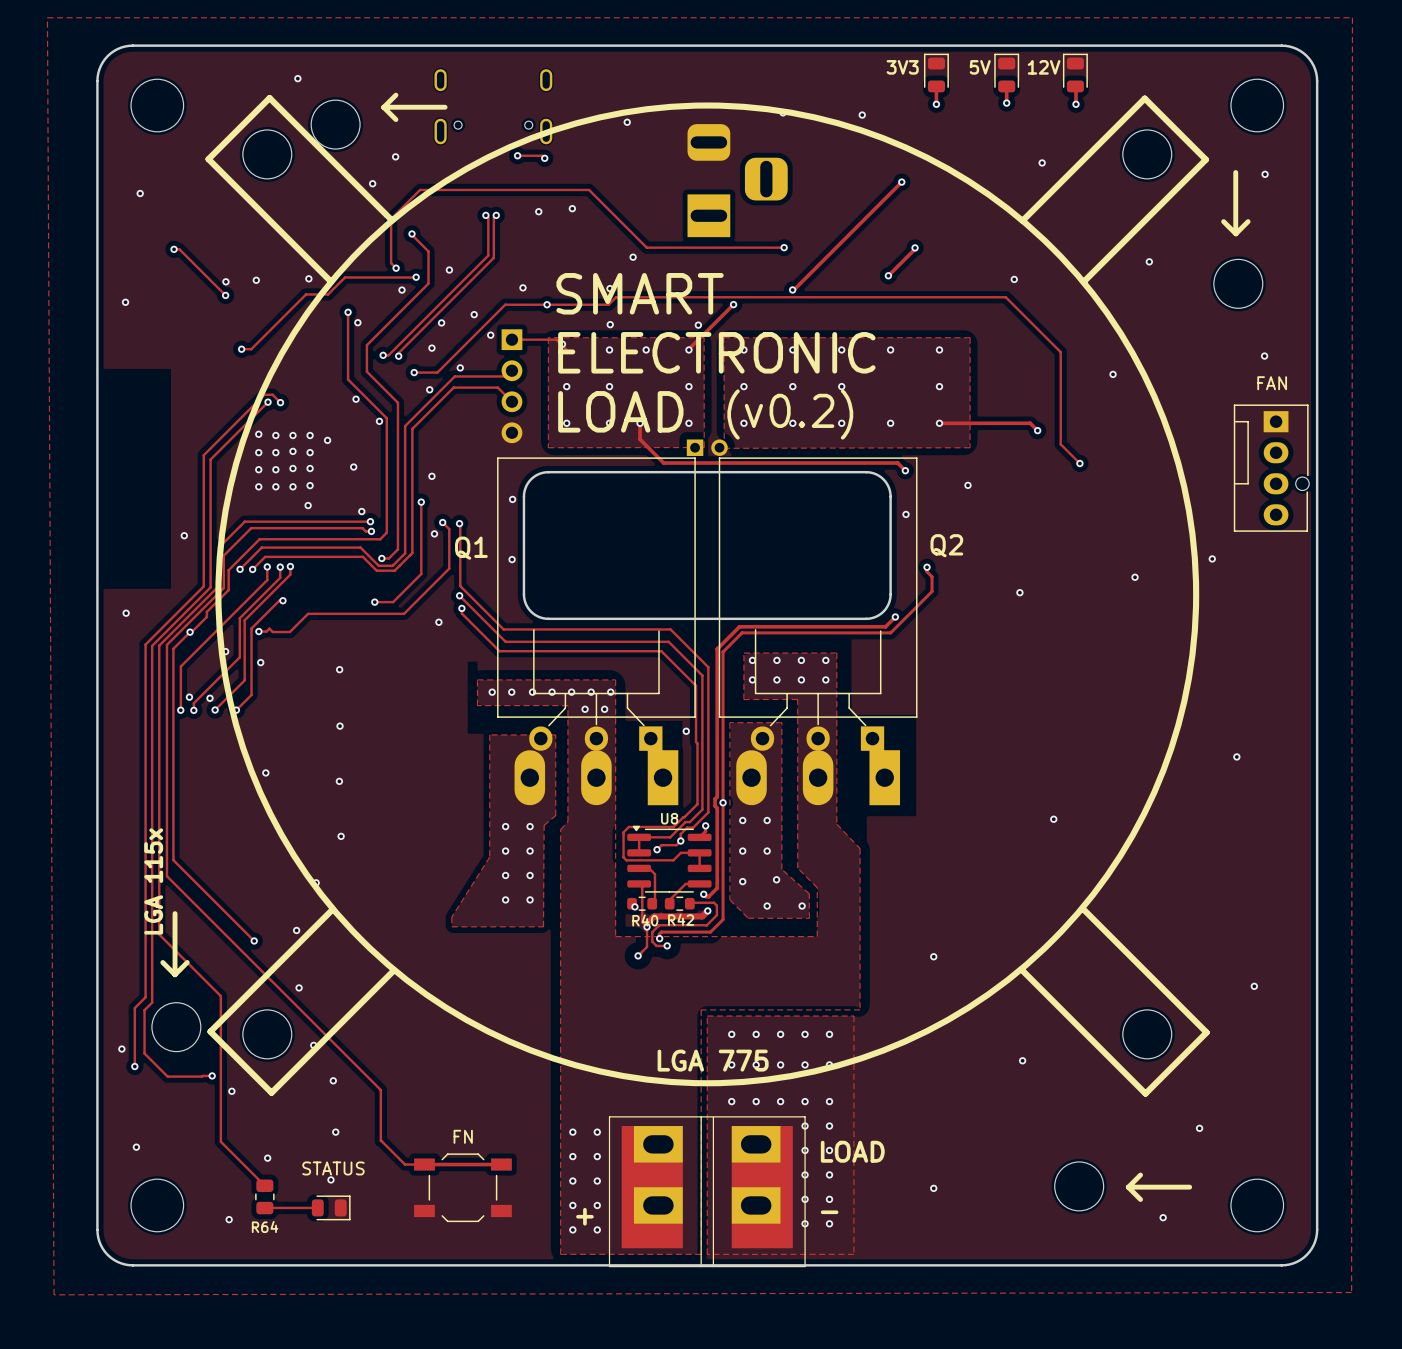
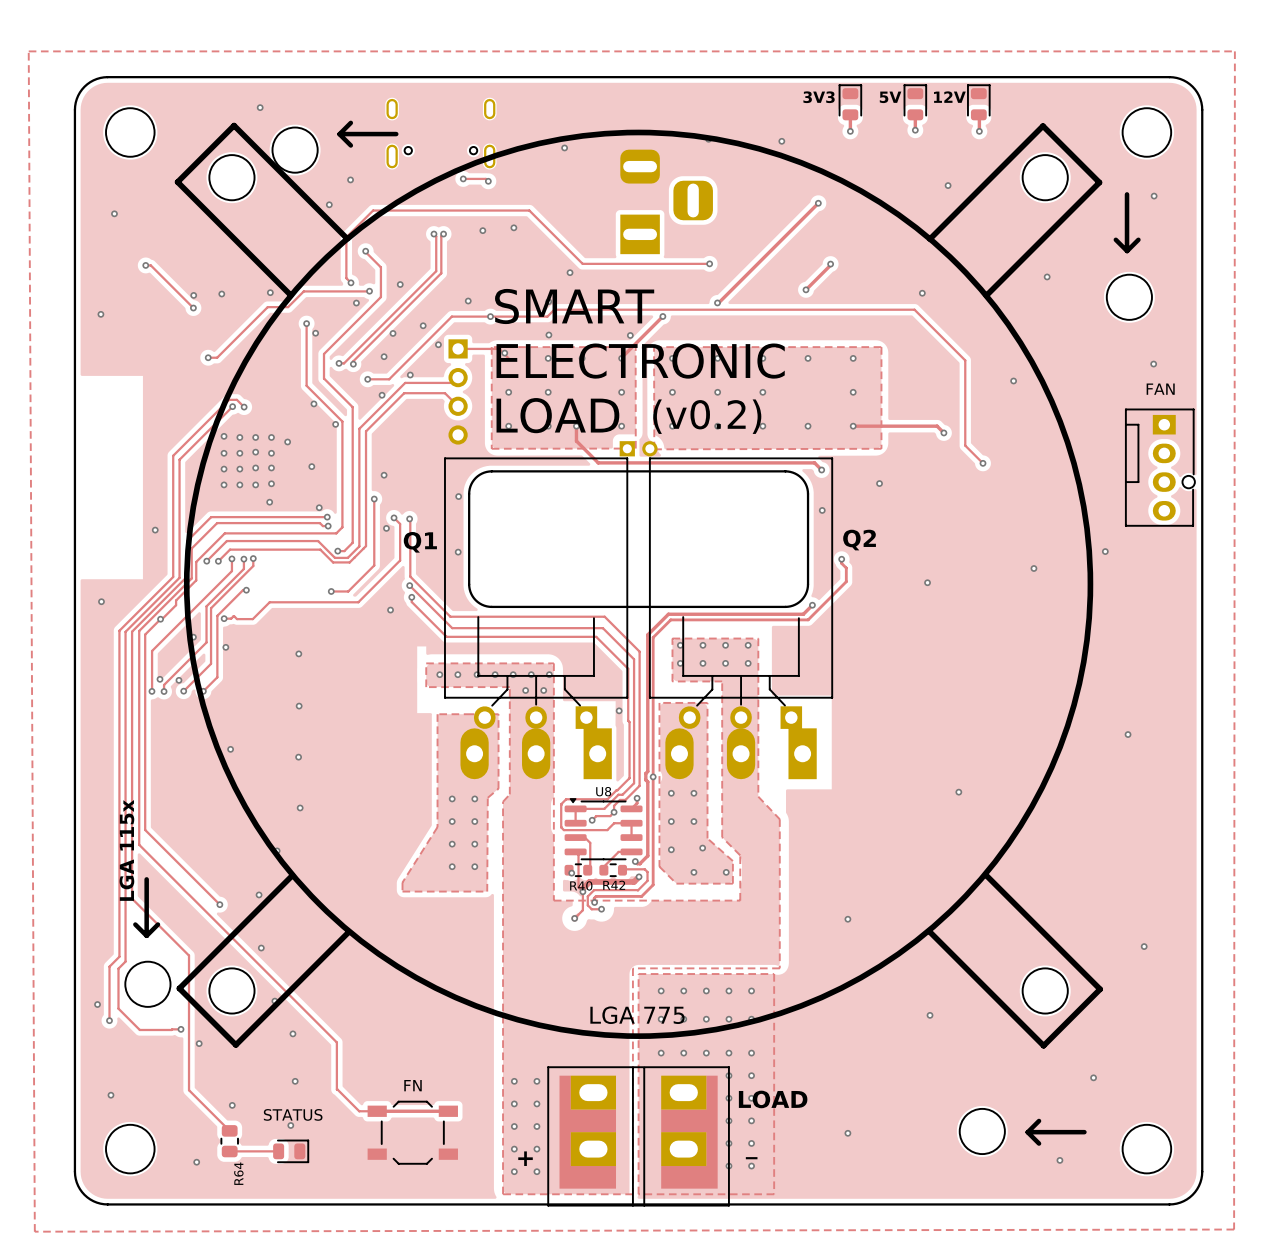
R64 name rotation: 0° (265, 1226) -> 90° counterclockwise (238, 1173)

